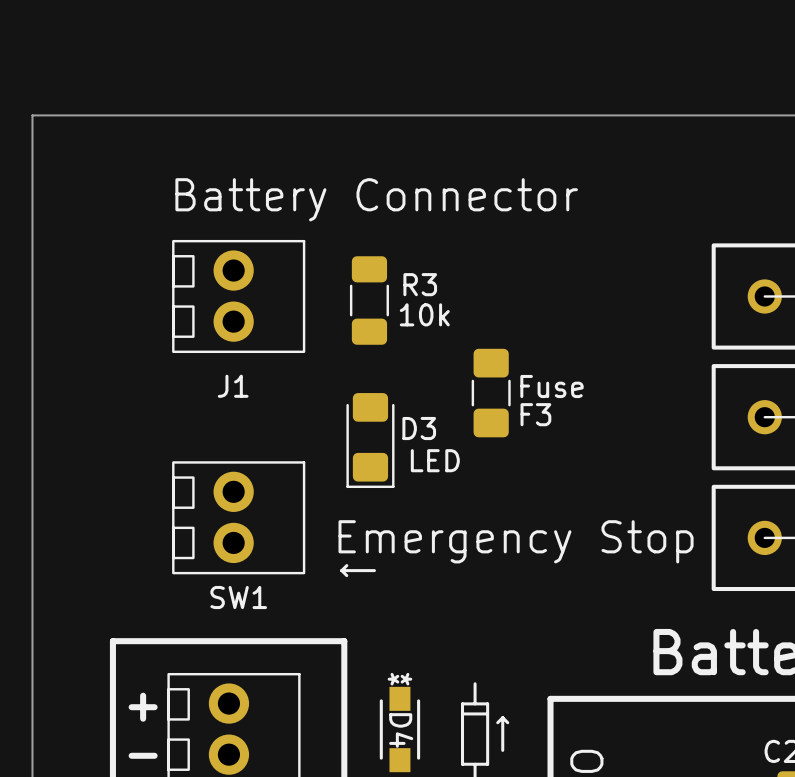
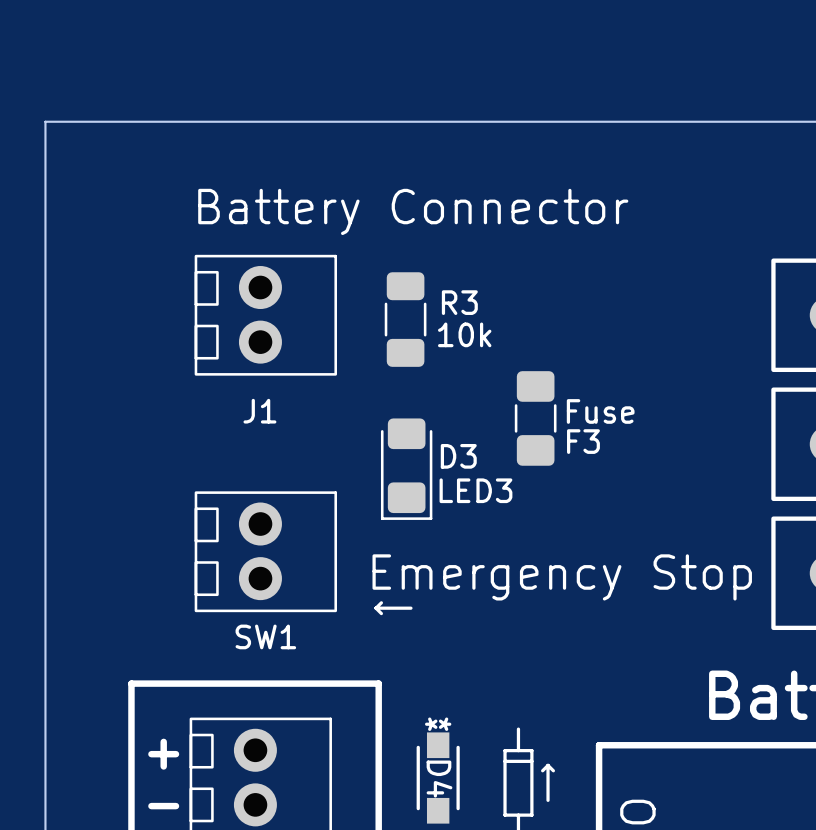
D3 value: LED (435, 460) -> LED3 (475, 490)

